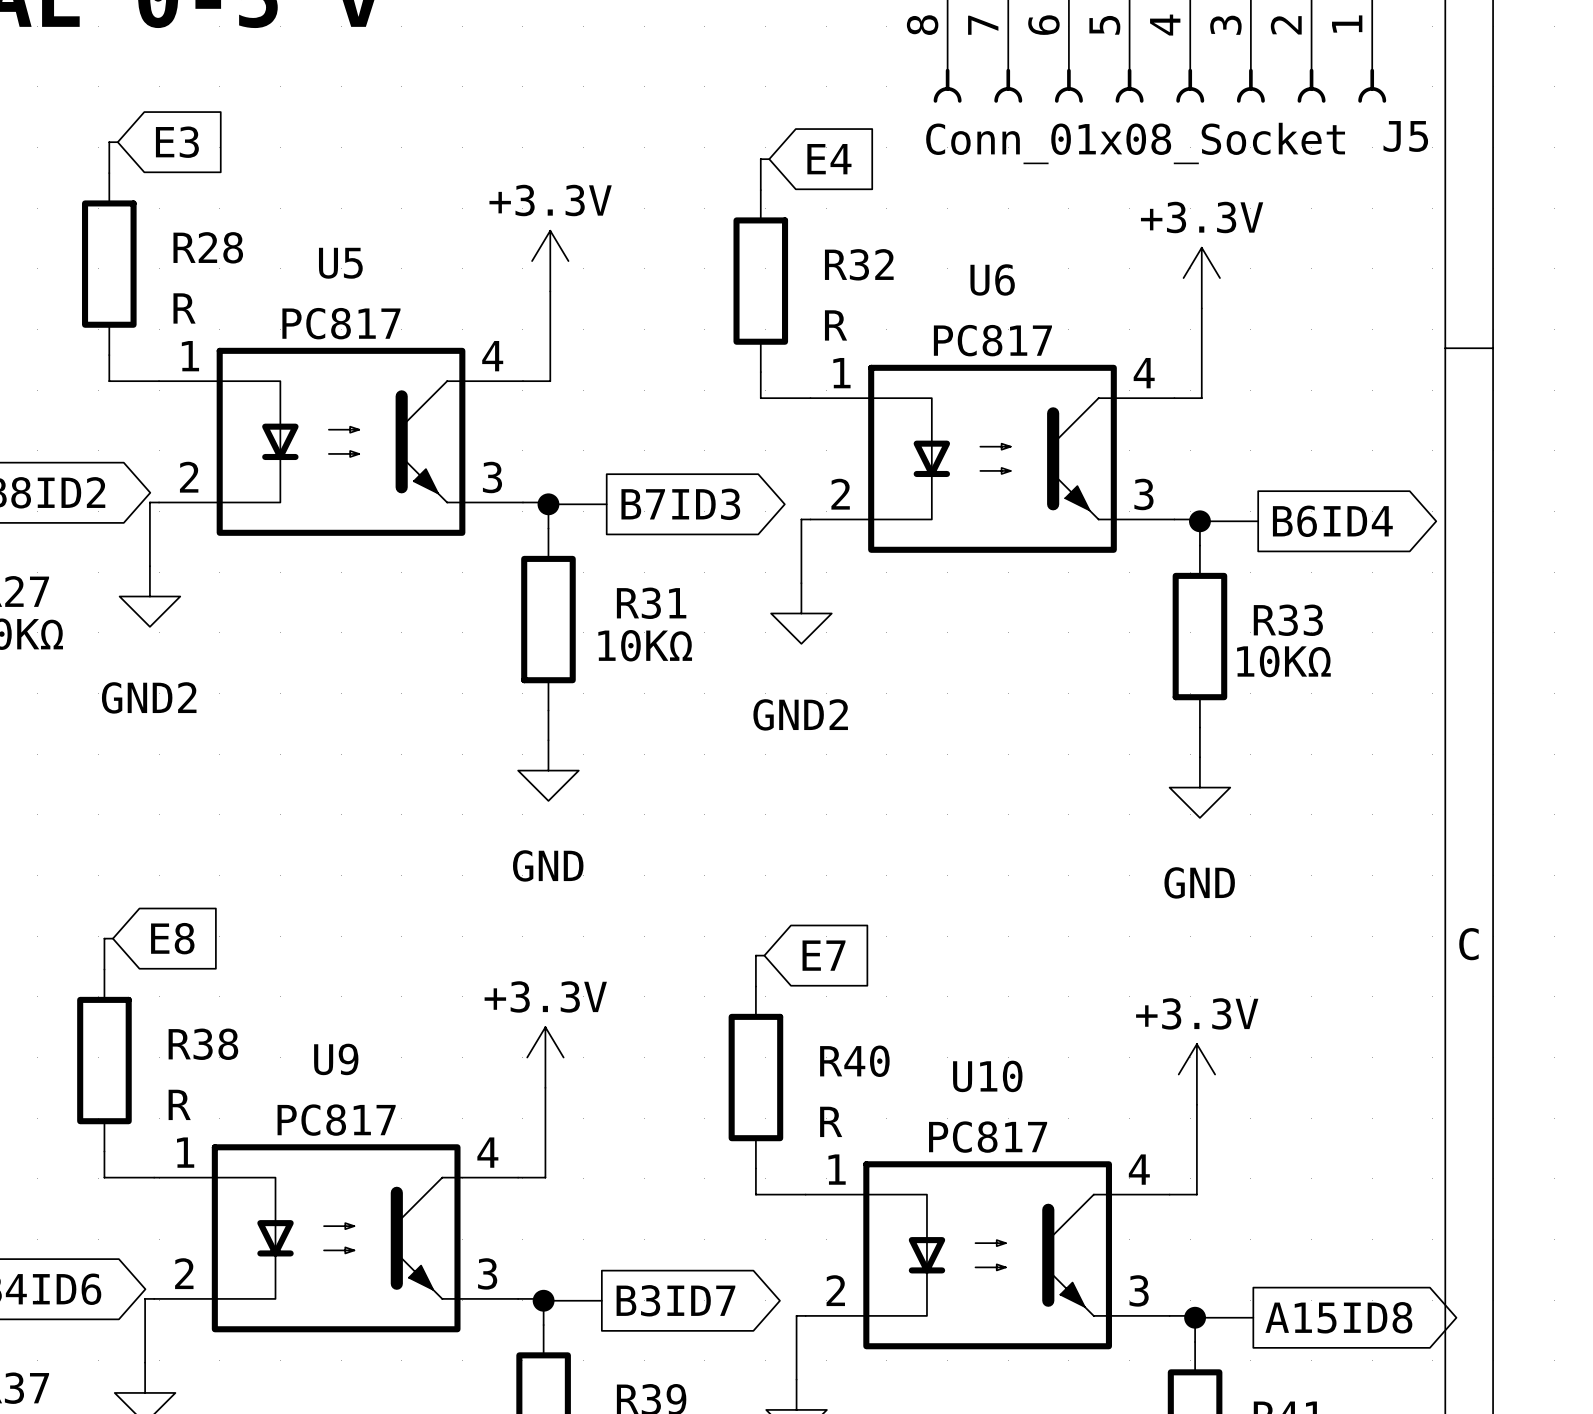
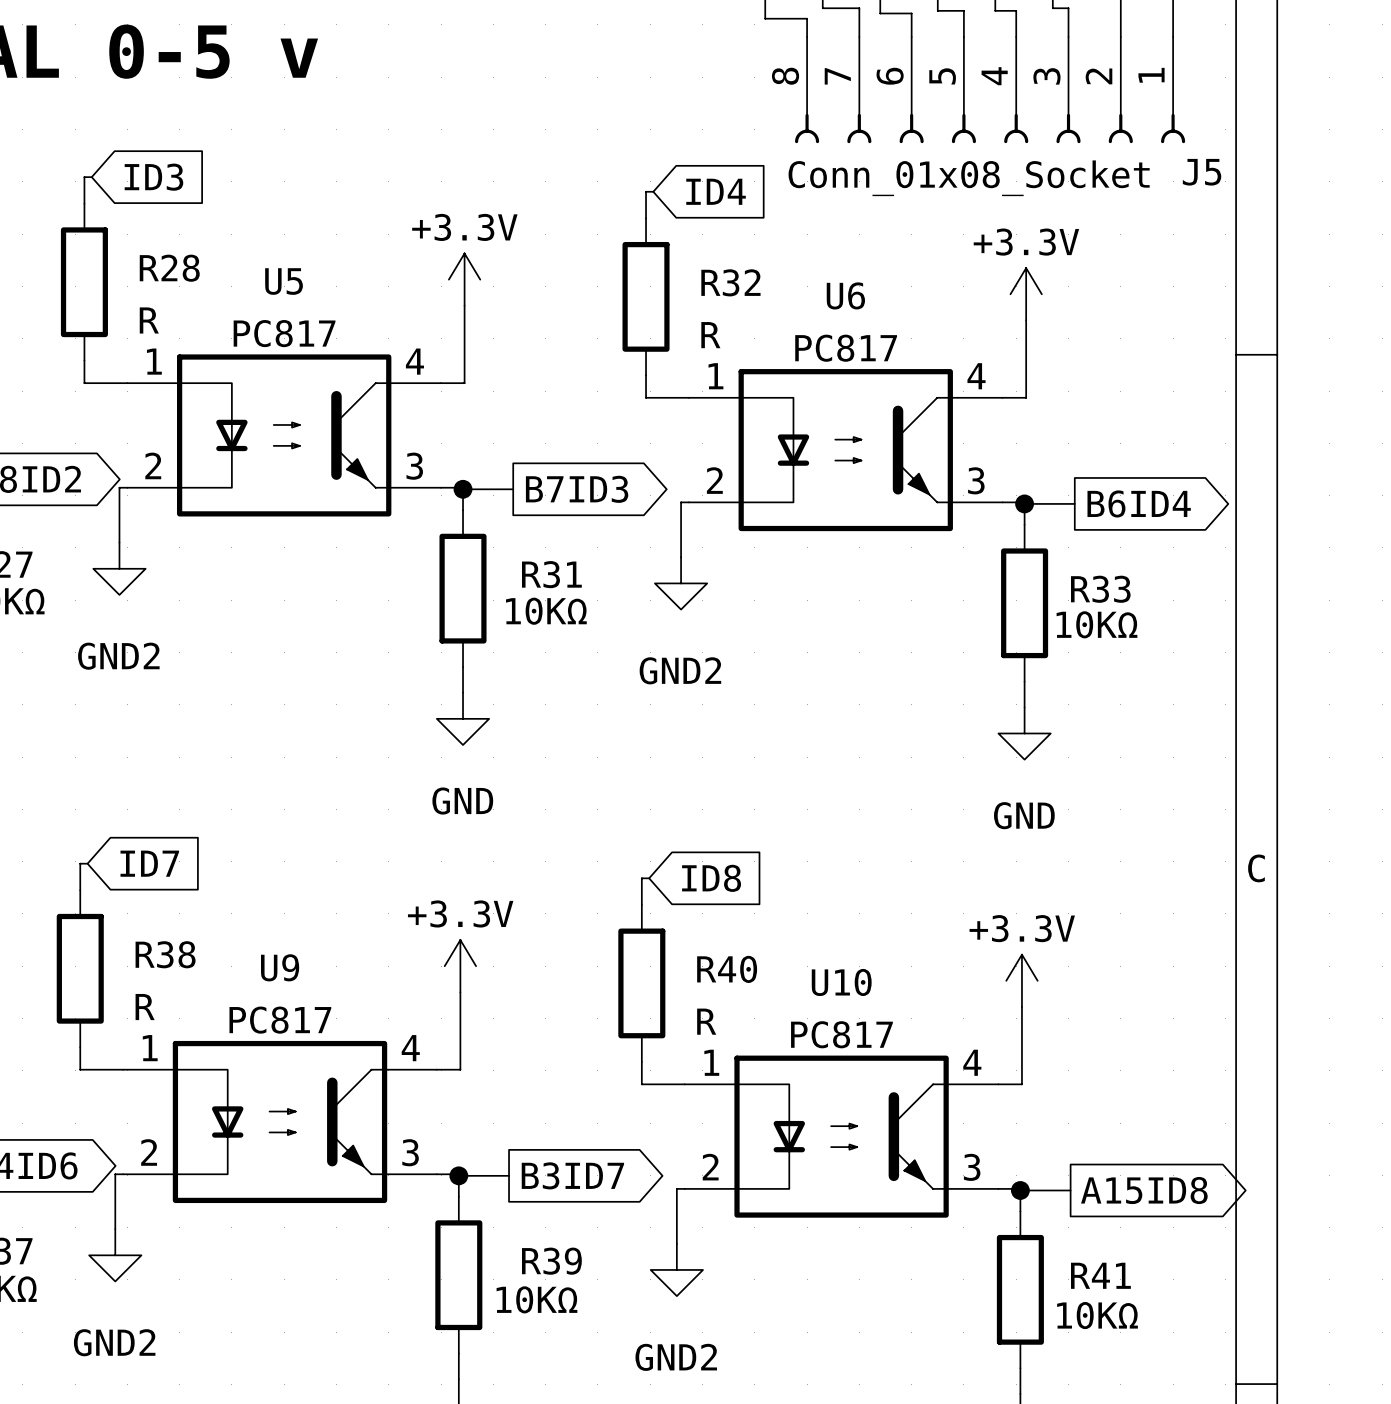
global label: E3 (177, 142) -> ID3 (153, 177)
global label: E4 (829, 159) -> ID4 (716, 191)
global label: E8 (172, 938) -> ID7 (149, 863)
global label: E7 (824, 955) -> ID8 (711, 878)

